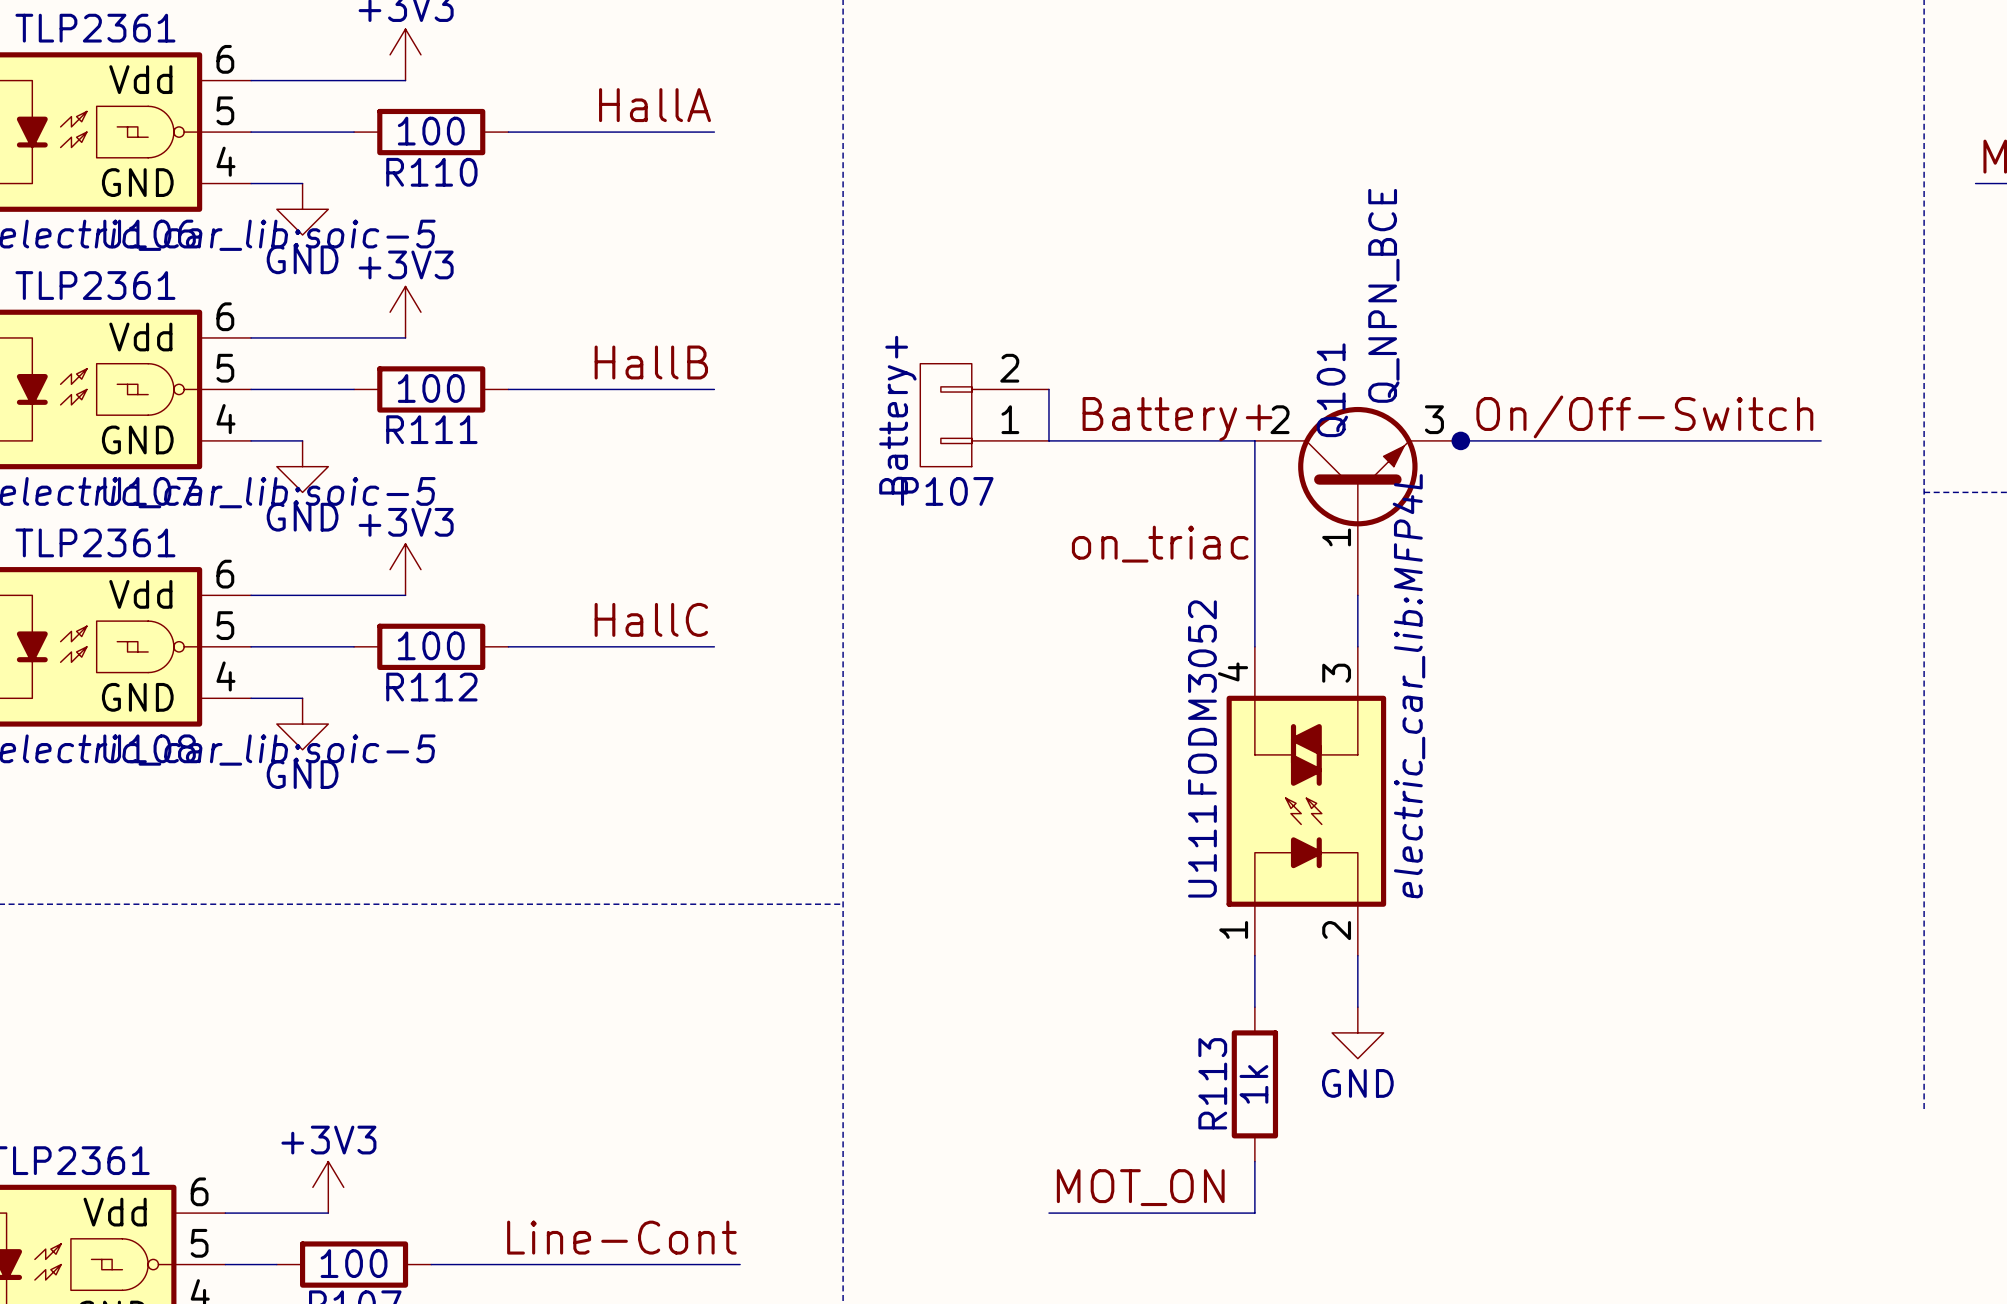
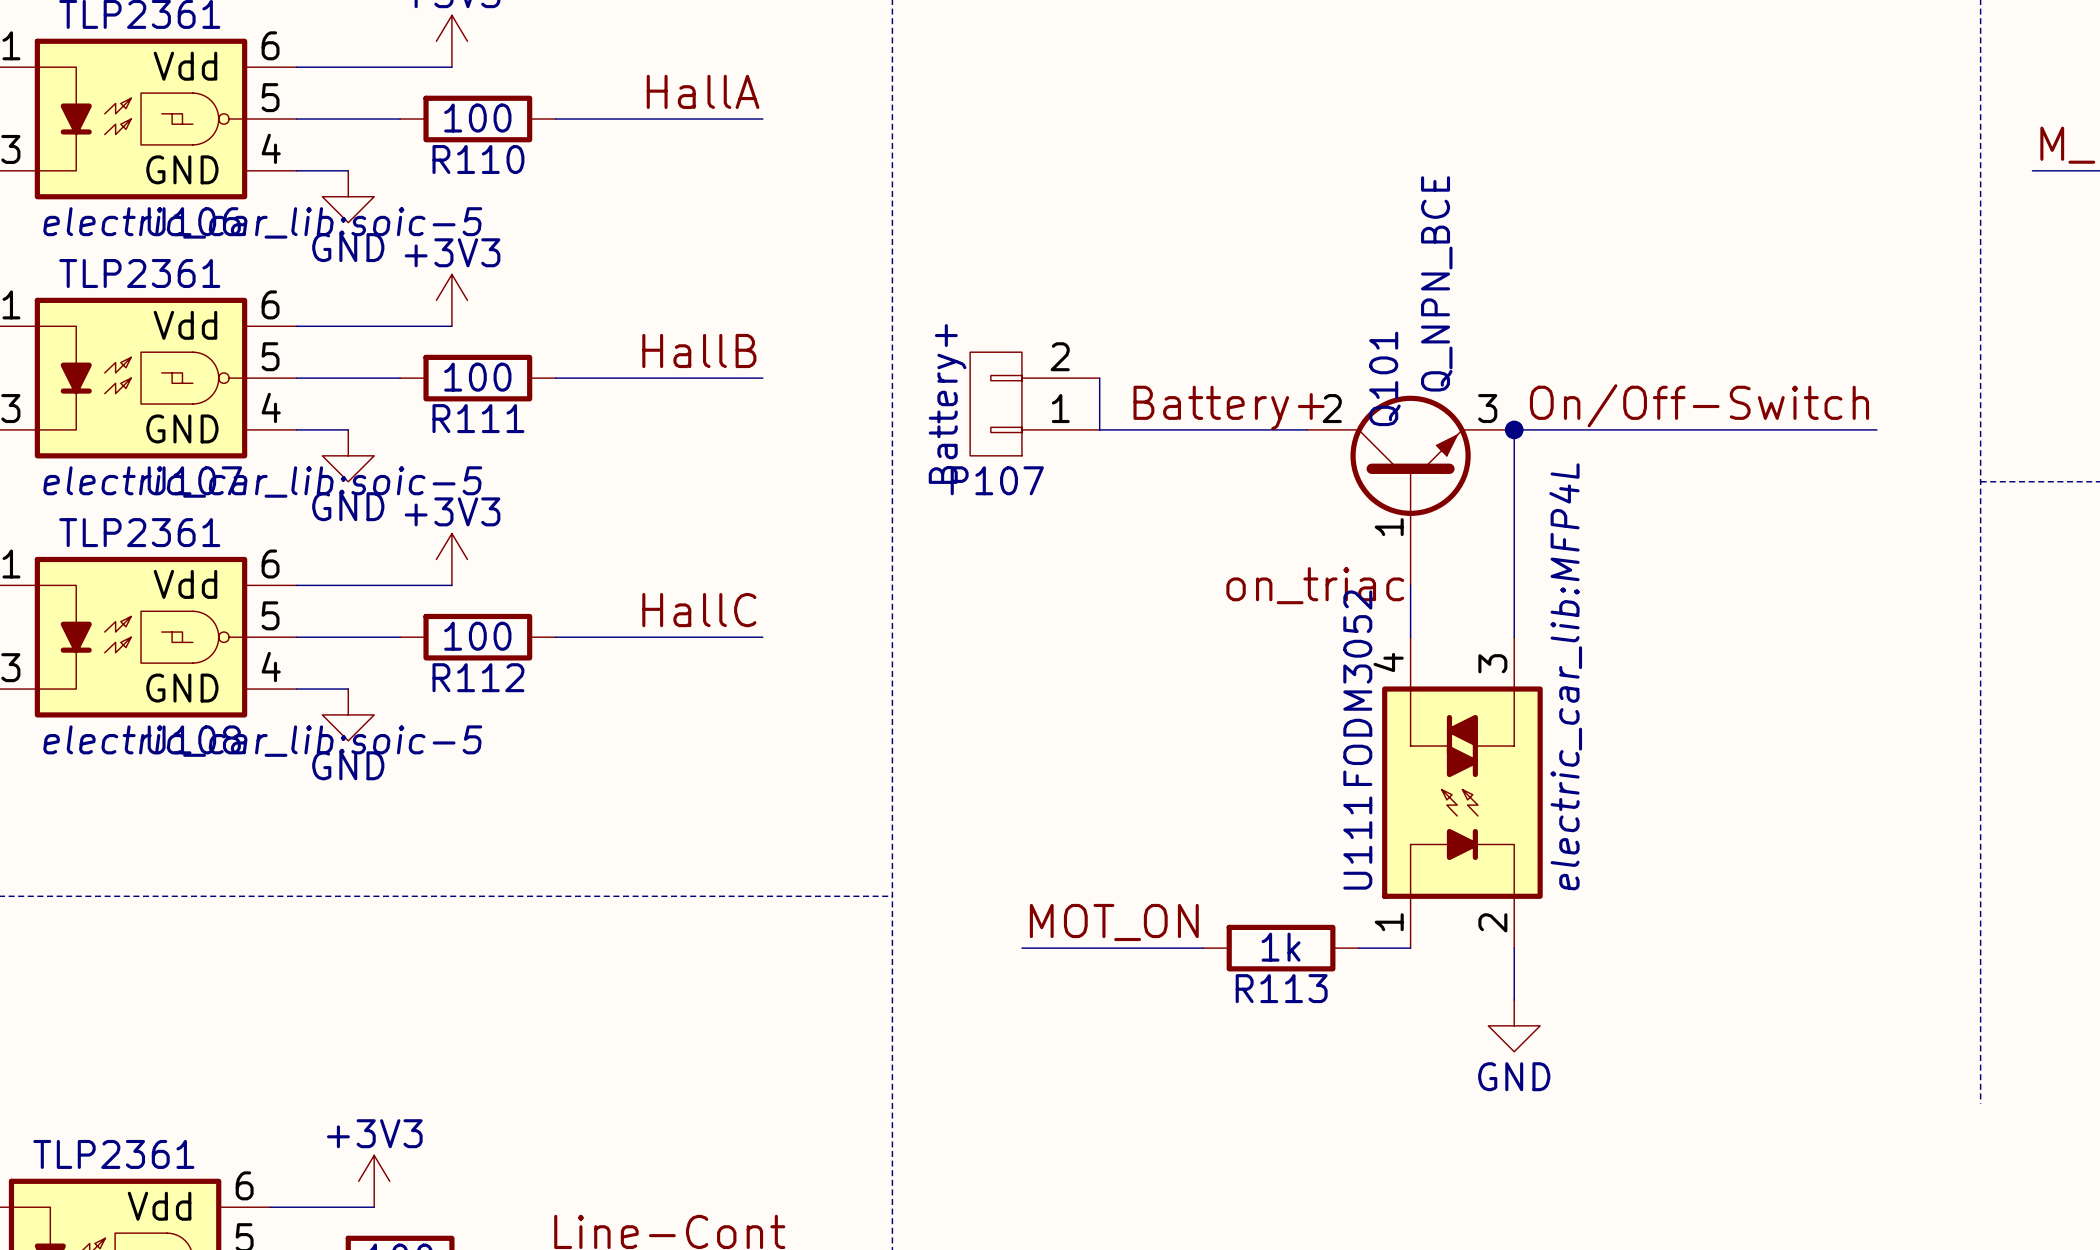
wire: (1254, 440) (1254, 646) -> (1514, 429) (1514, 637)
label position: on_triac (1160, 544) -> on_triac (1315, 585)
U111 position: (1306, 801) -> (1462, 792)
wire: none -> (1021, 948) (1203, 948)
wire: (1254, 955) (1254, 1007) -> (1514, 948) (1514, 999)
wire: (1357, 955) (1357, 1007) -> (1410, 948) (1358, 948)
power symbol position: GND (1357, 1032) -> GND (1514, 1025)
R113 name position: R113 (1212, 1083) -> R113 (1281, 988)
R113 rotation: 0° (1254, 1084) -> 90° clockwise (1281, 948)
R113 position: (1254, 1084) -> (1281, 948)
wire: (1254, 1161) (1254, 1213) (1048, 1213) -> none
label position: MOT_ON (1140, 1187) -> MOT_ON (1114, 922)

